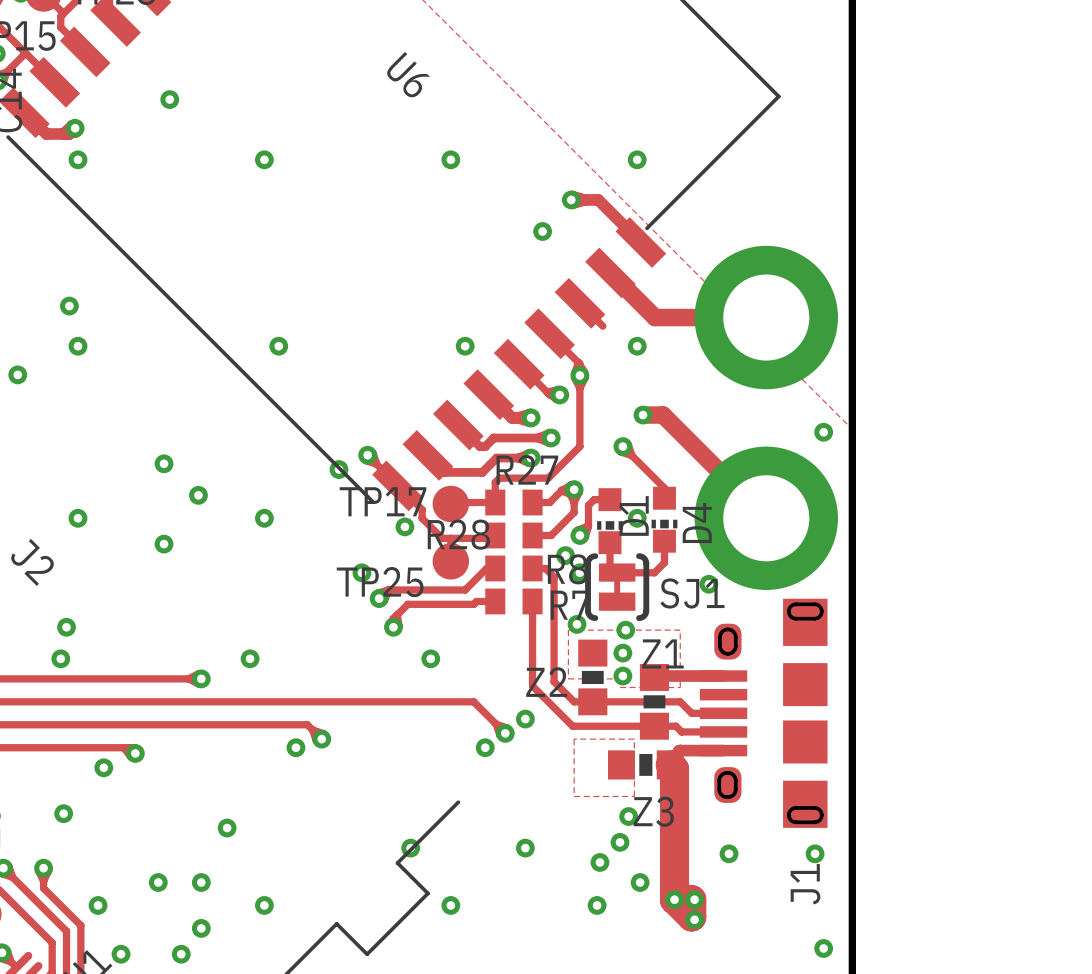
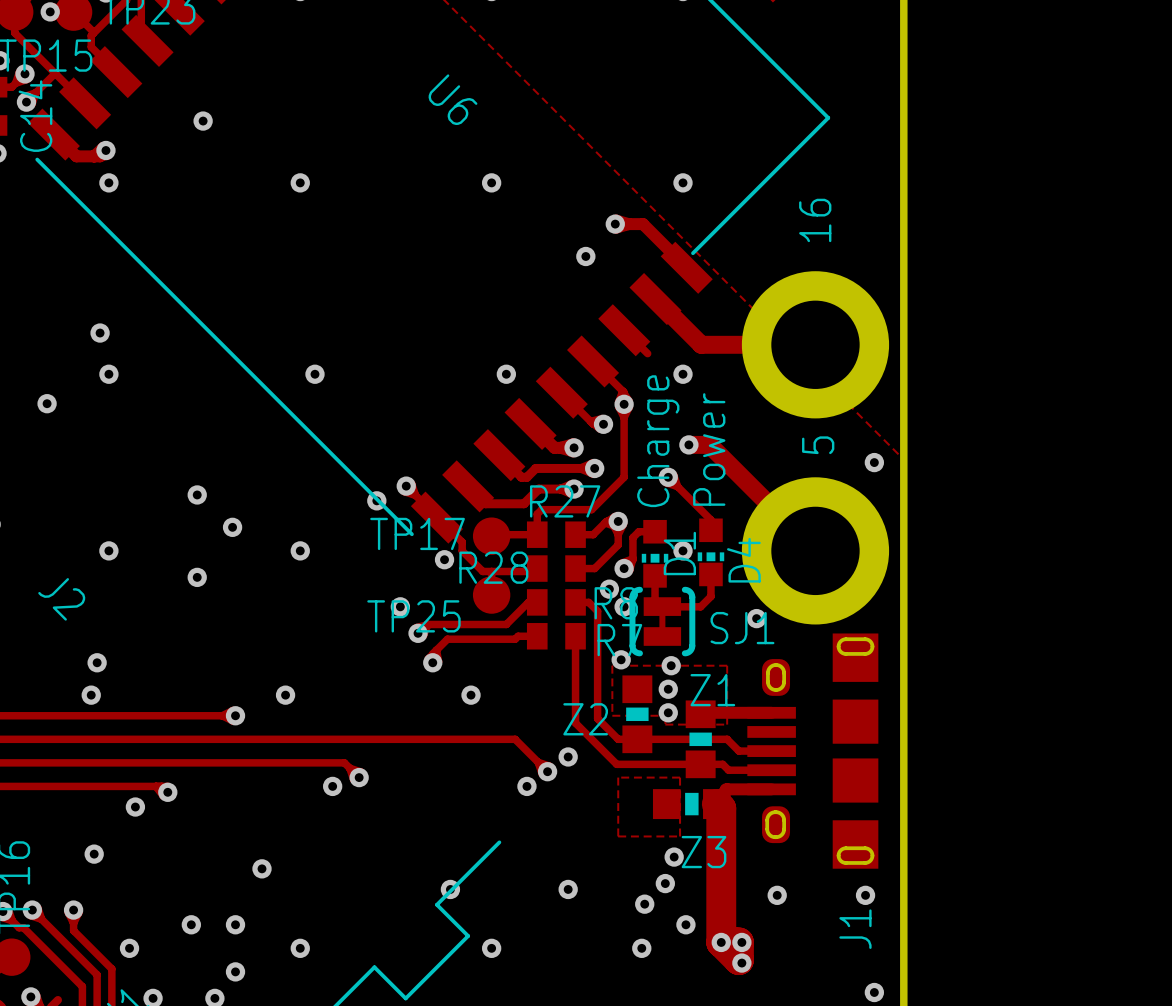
text: none -> 16 (815, 220)
text: none -> Charge (658, 441)
text: none -> 5 (818, 445)
text: none -> Power (709, 449)

